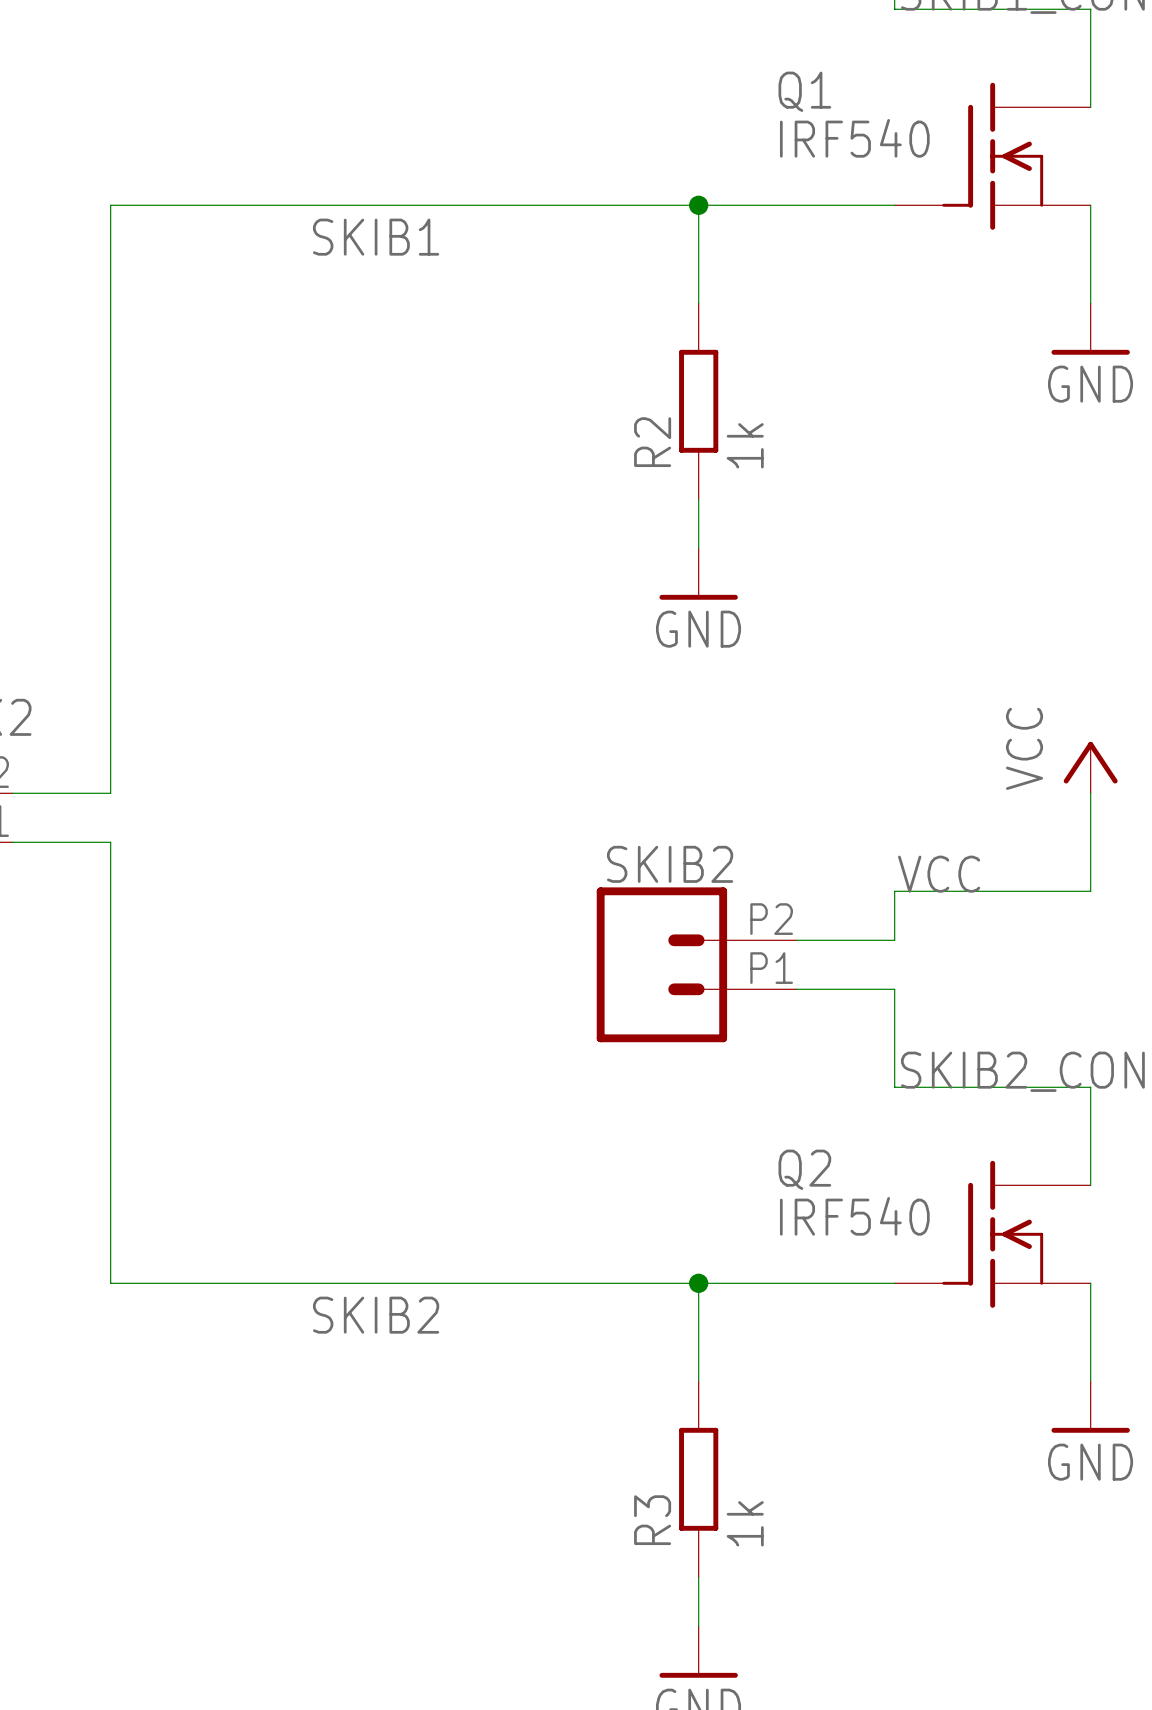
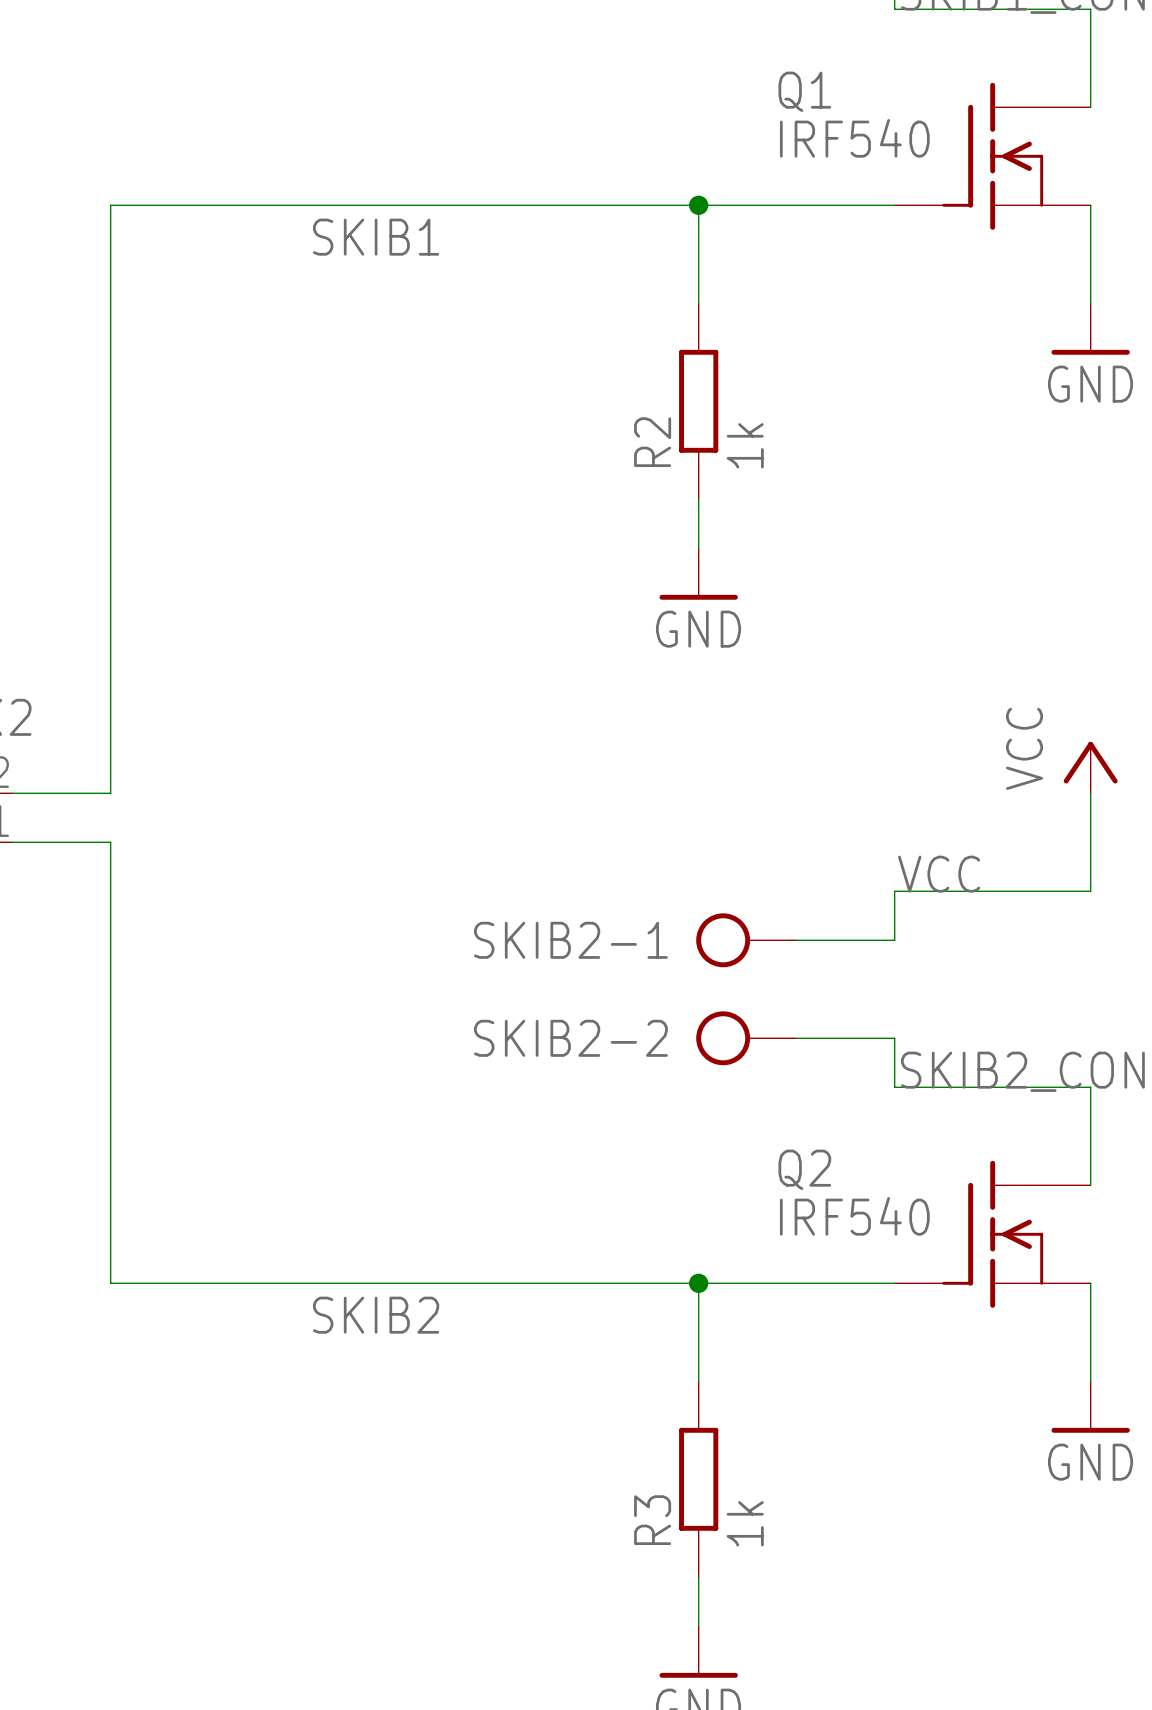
SKIB2-1: none -> (746, 940)
SKIB2: (696, 964) -> none
wire: (796, 989) (894, 989) (894, 1038) -> (796, 1038) (894, 1038)
SKIB2-2: none -> (746, 1038)

